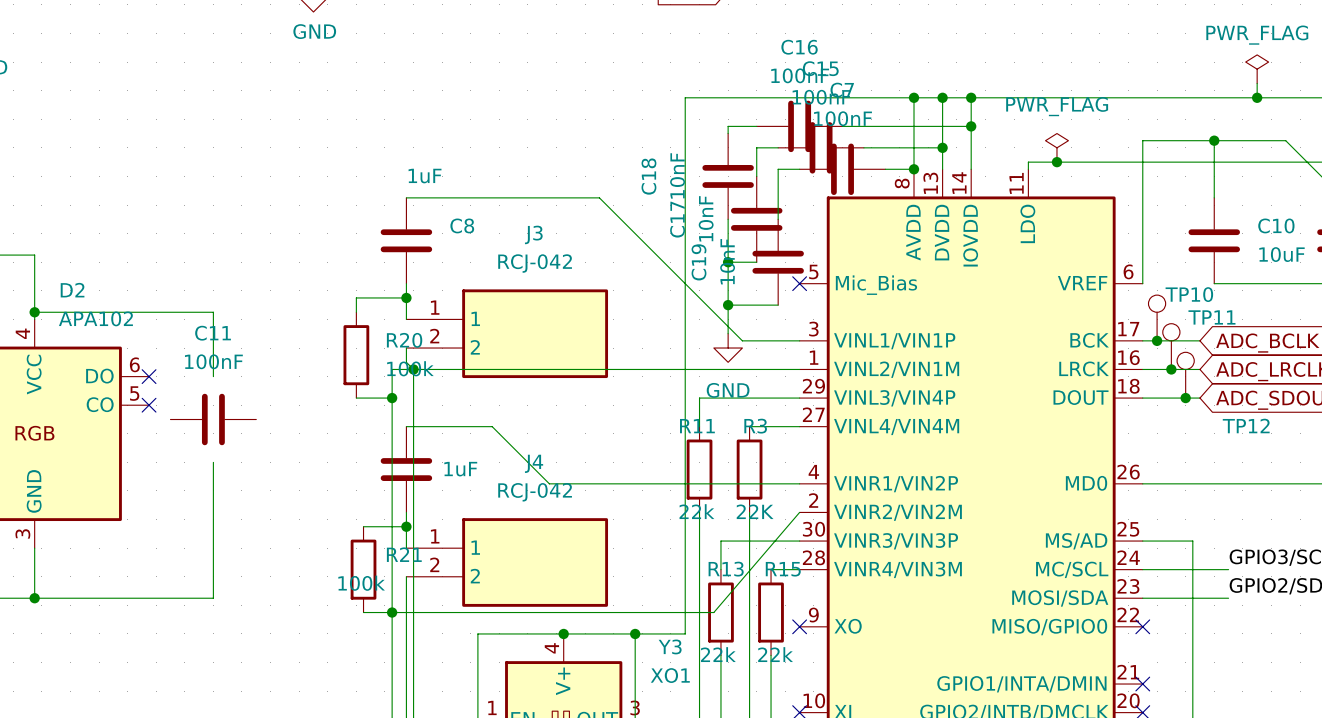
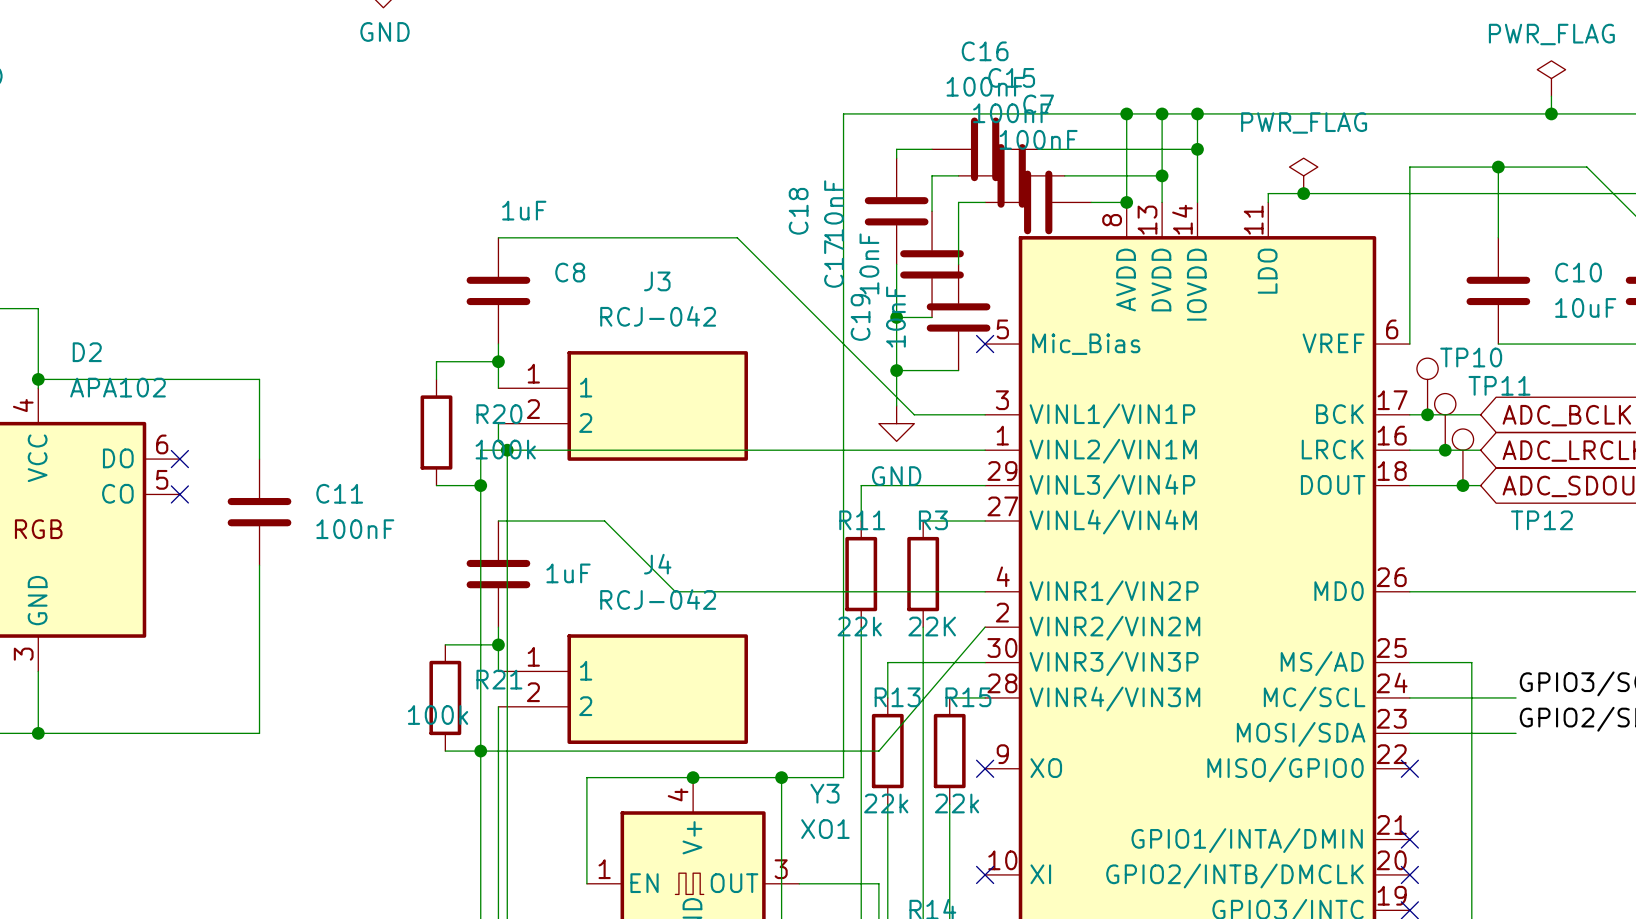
C11 name position: C11 (213, 333) -> C11 (339, 493)
C11 value position: 100nF (213, 361) -> 100nF (355, 529)
C11 rotation: 0° (213, 419) -> 90° clockwise (259, 512)

